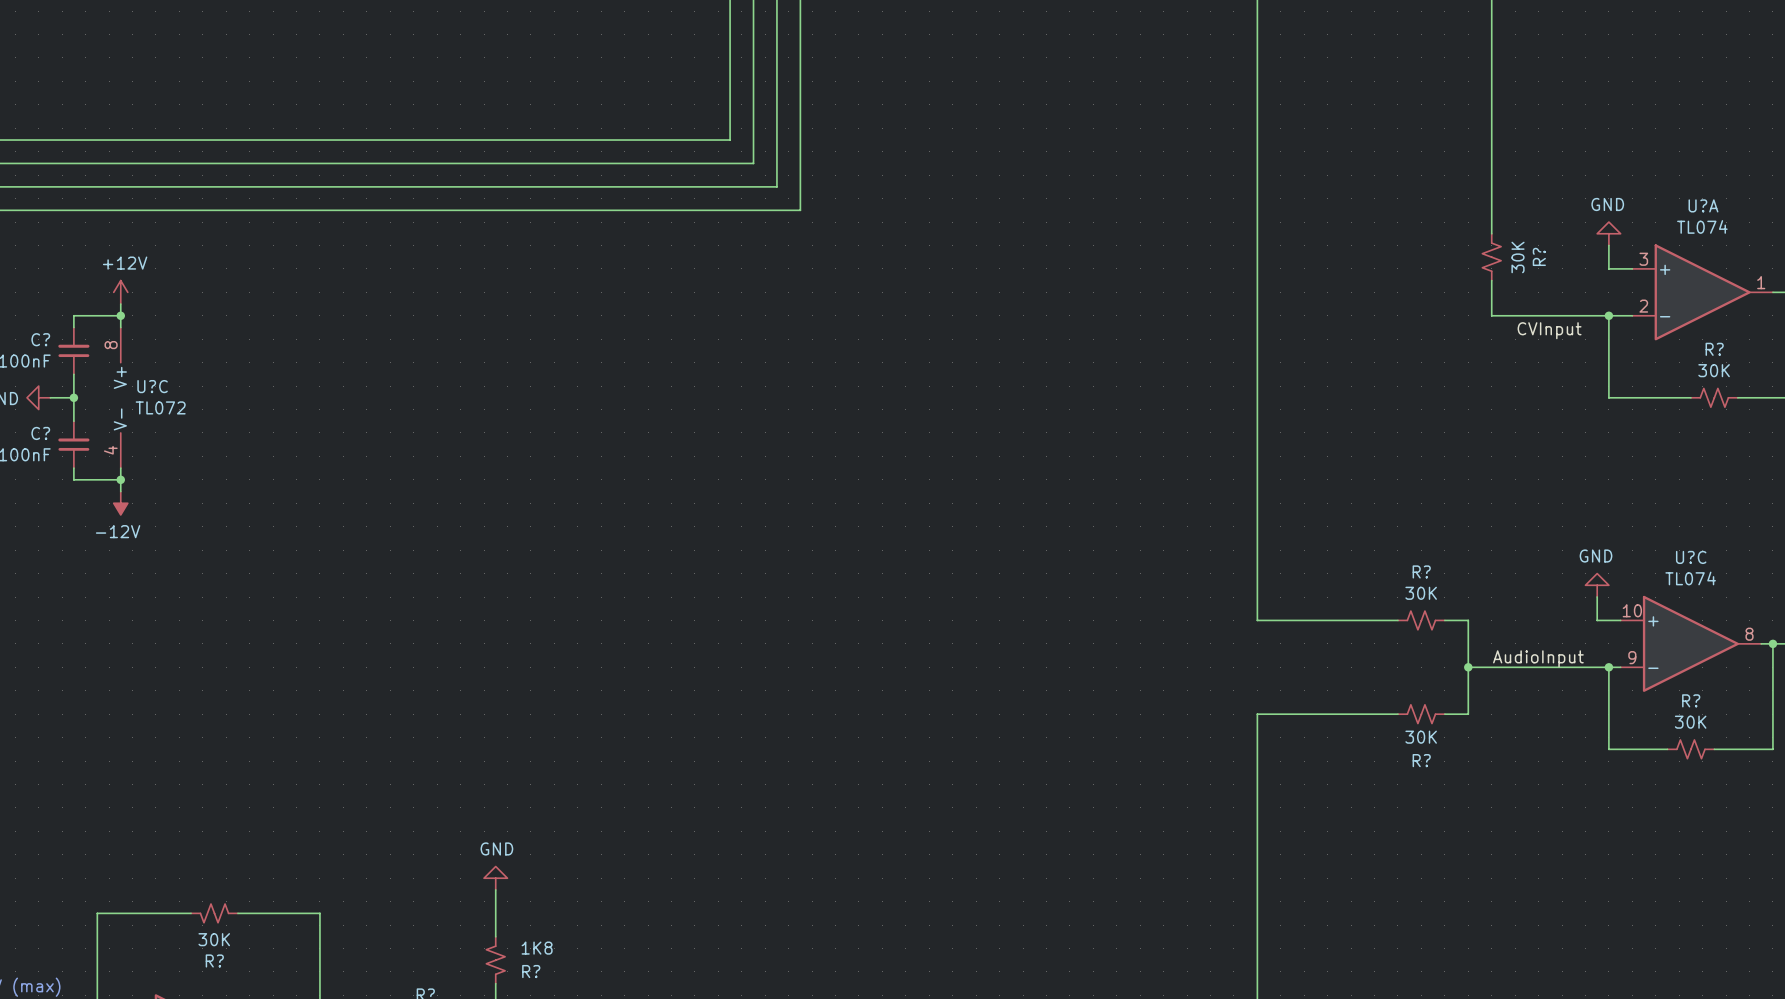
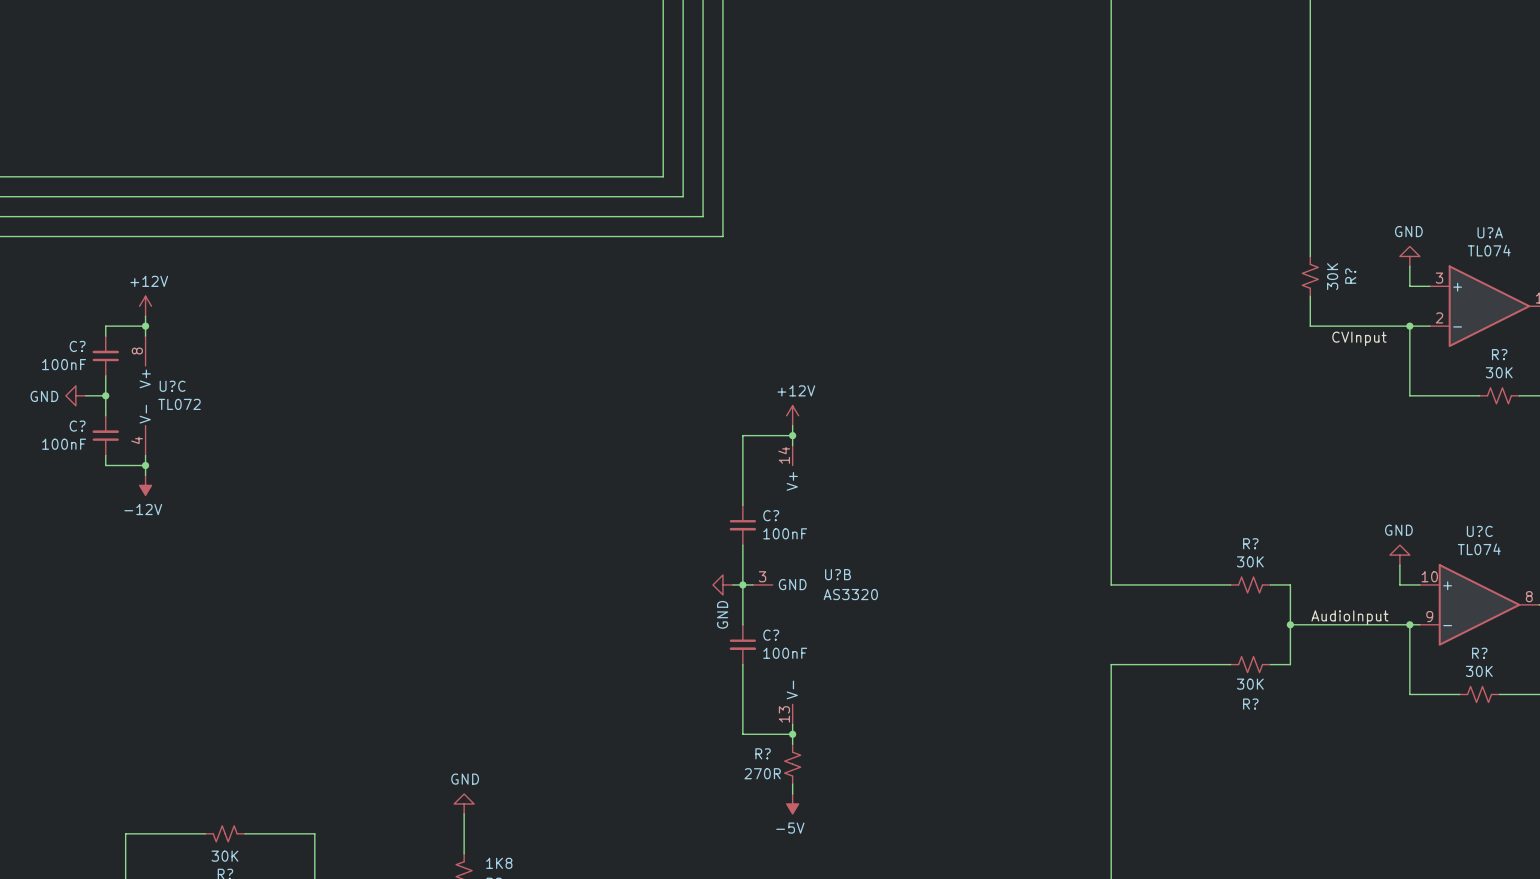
power symbol: none -> +12V (792, 415)
wire: none -> (792, 425) (792, 445)
wire: none -> (792, 435) (742, 435) (742, 505)
junction: none -> (792, 435)
C?: none -> 100nF (742, 525)
wire: none -> (742, 545) (742, 624)
power symbol: none -> GND (722, 584)
wire: none -> (732, 584) (752, 584)
junction: none -> (742, 584)
U?B: none -> AS3320 (772, 584)
C?: none -> 100nF (742, 644)
wire: none -> (742, 664) (742, 734) (792, 734)
wire: none -> (792, 724) (792, 744)
junction: none -> (792, 734)
R?: none -> 270R (792, 764)
wire: none -> (792, 784) (792, 794)
power symbol: none -> -5V (792, 803)

